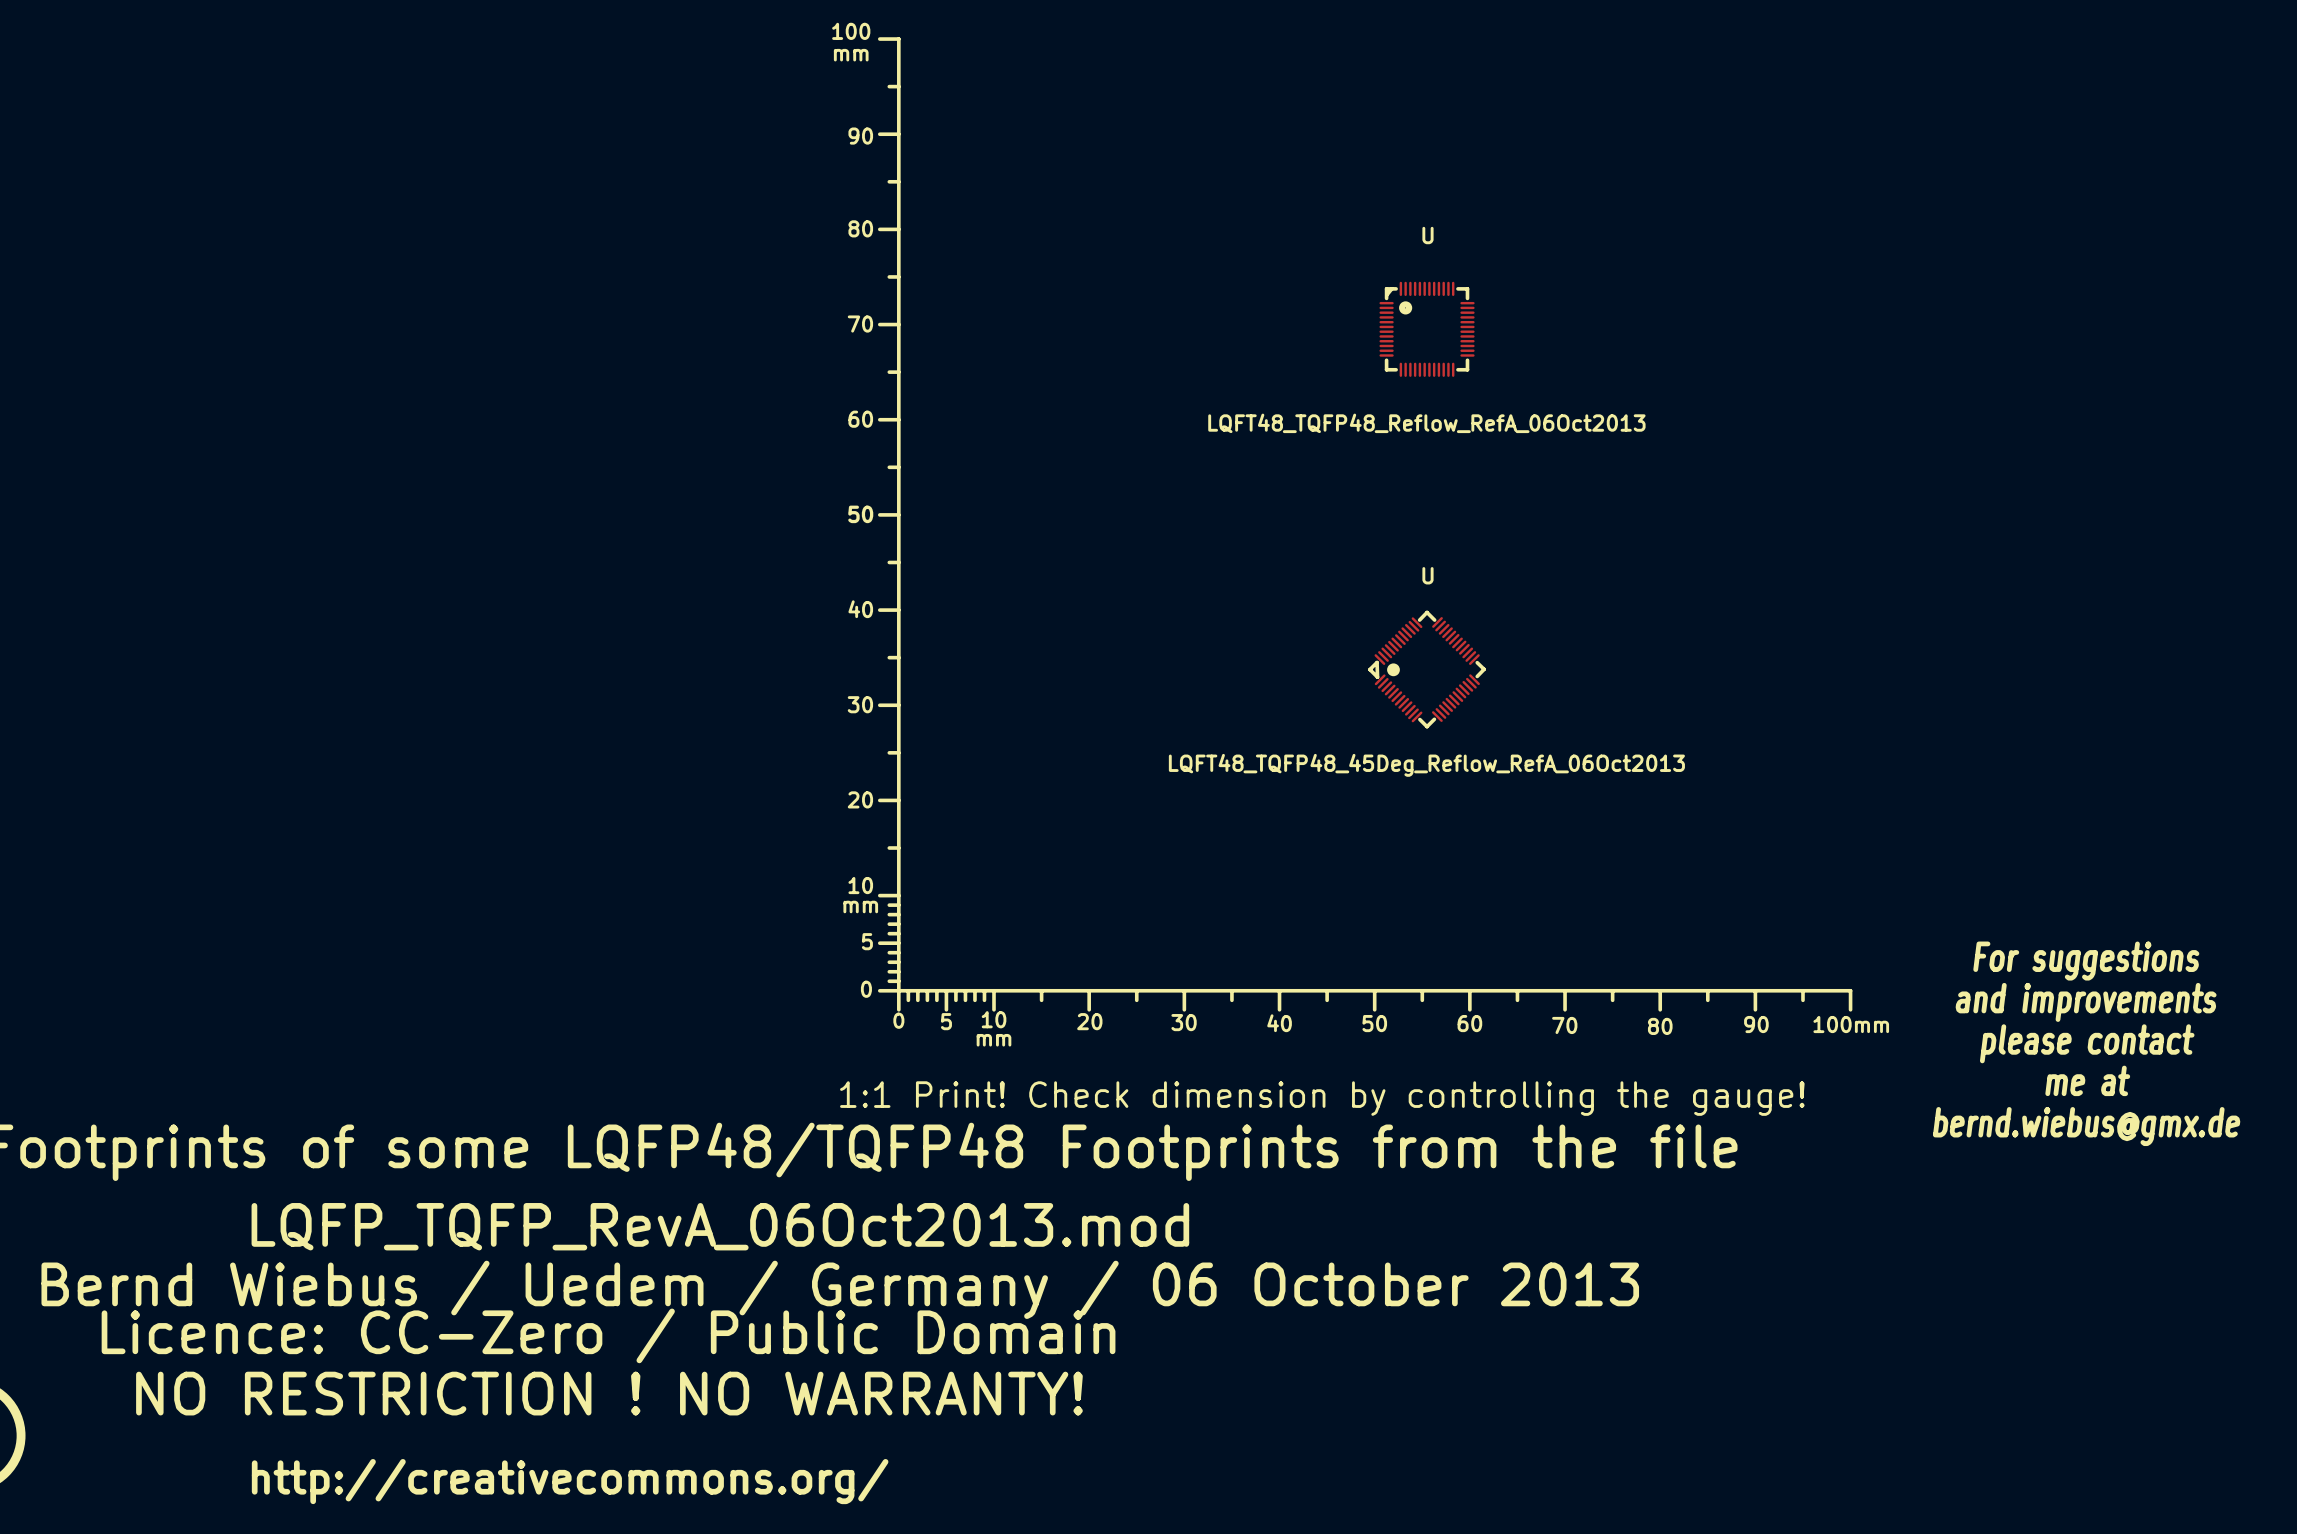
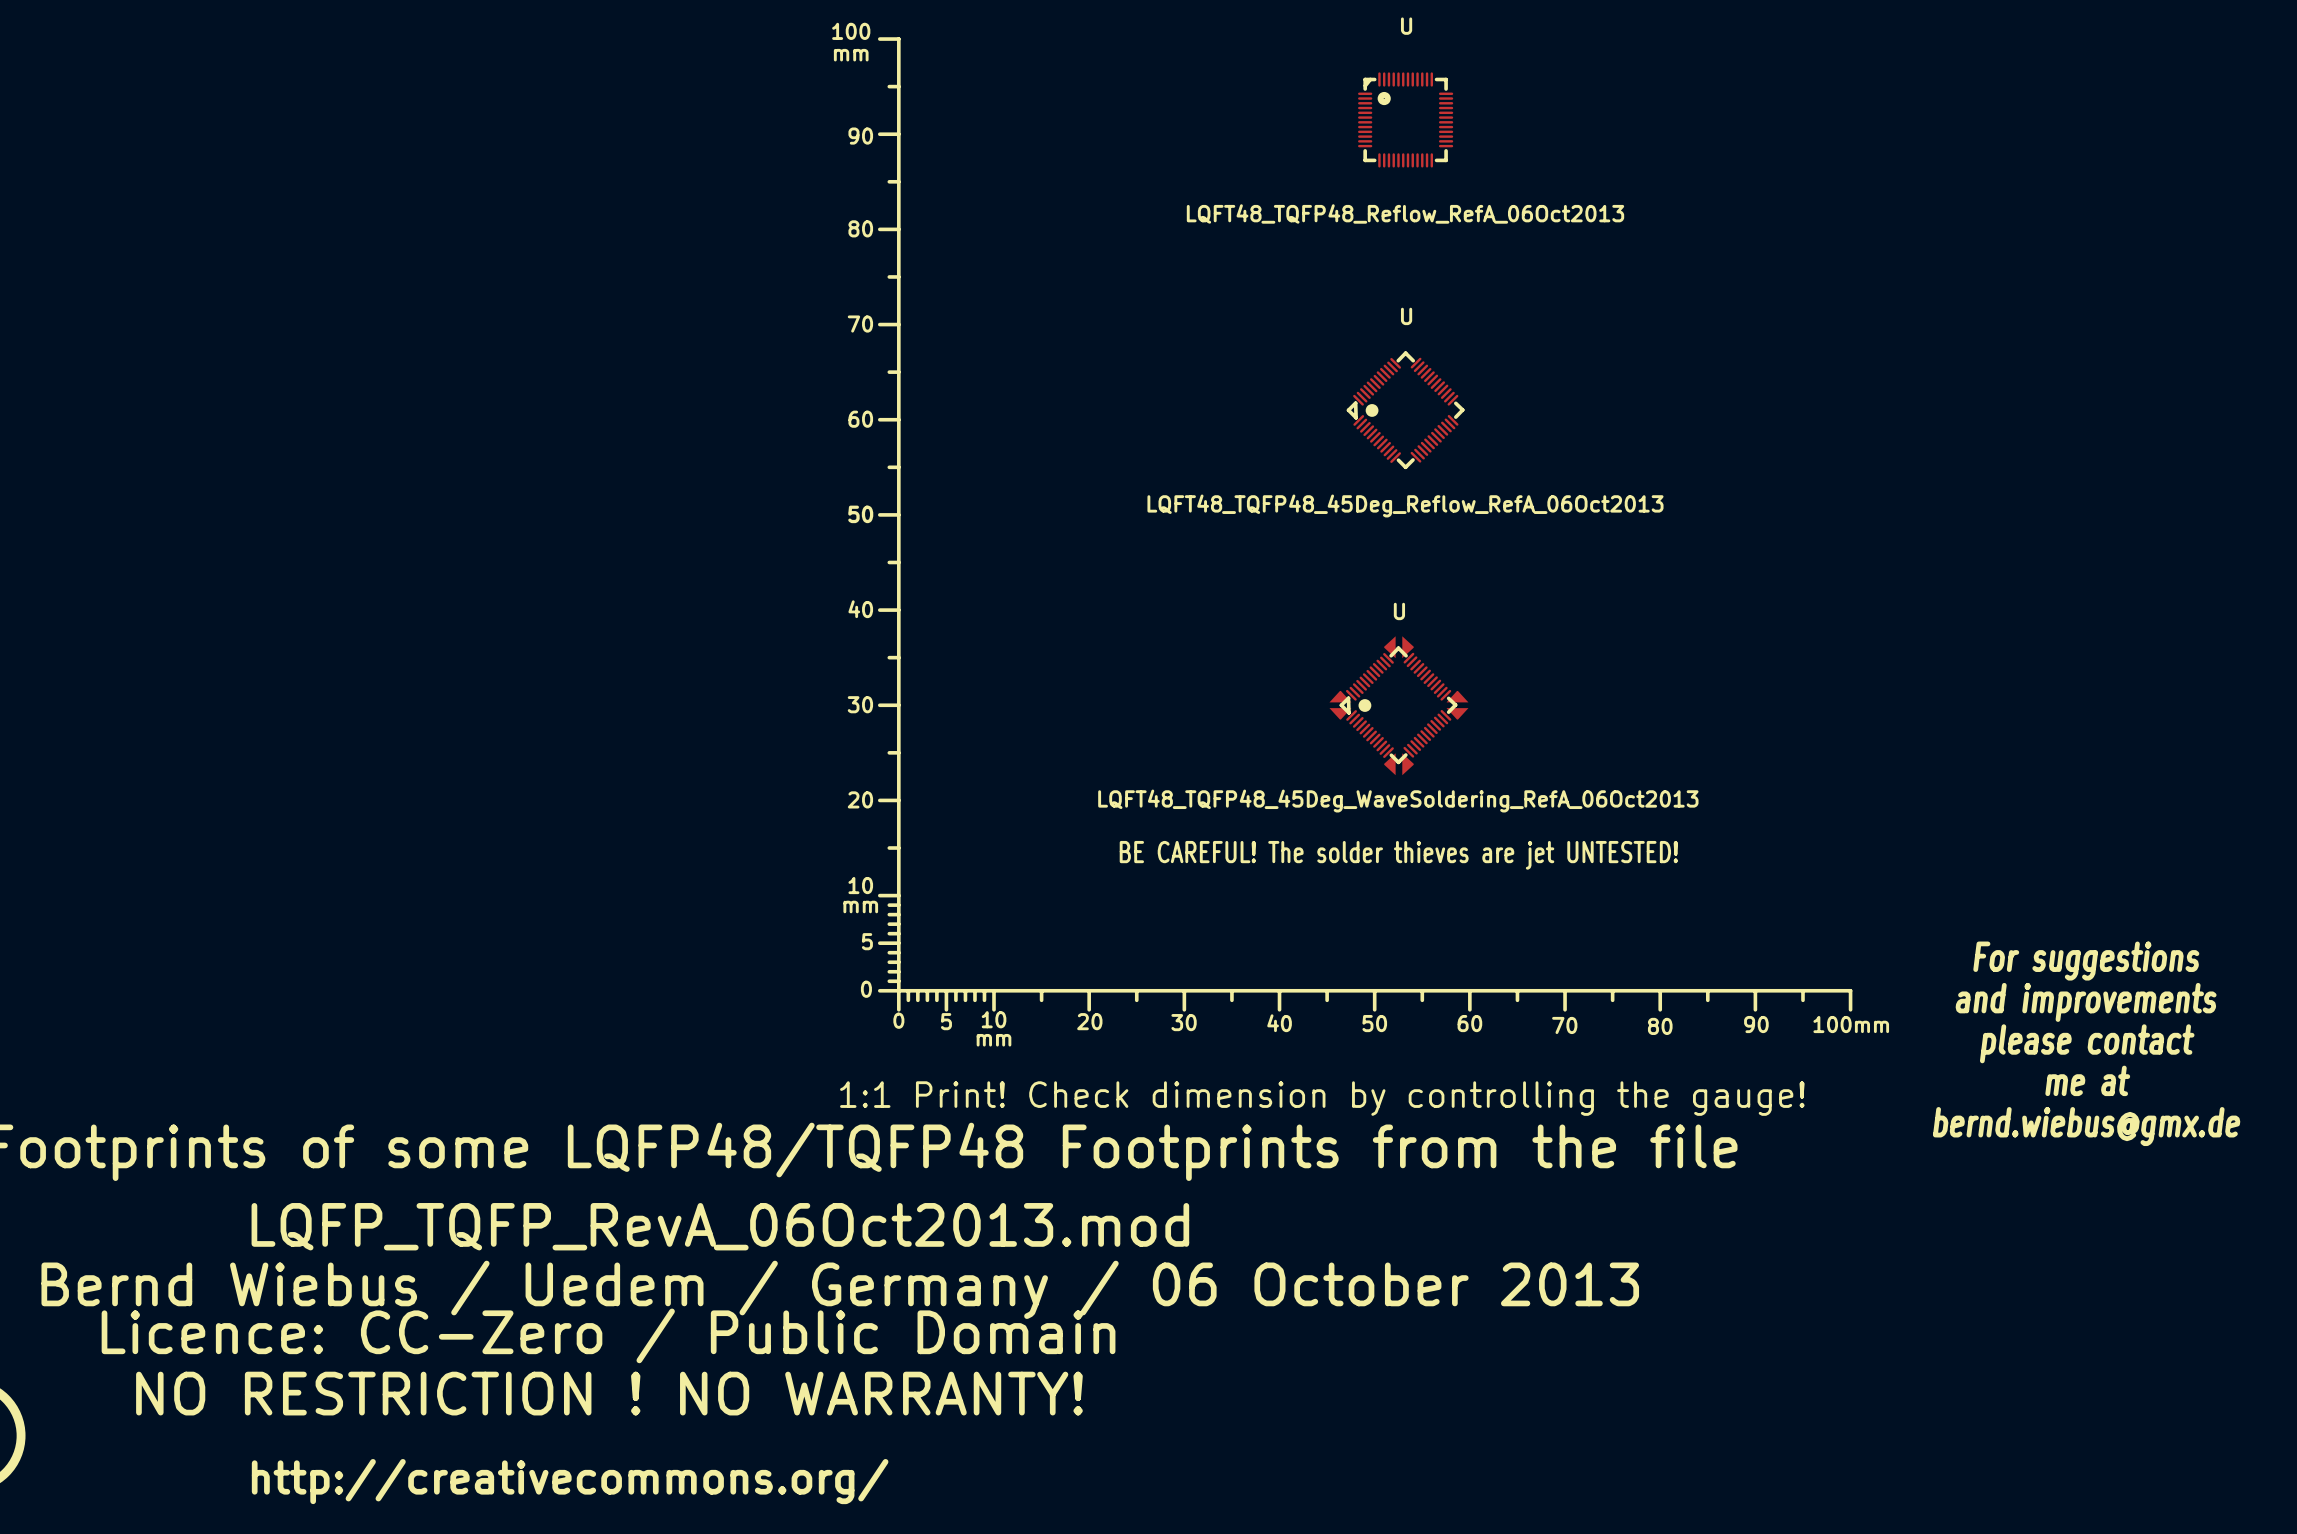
U position: (1427, 329) -> (1405, 119)
U: none -> LQFT48_TQFP48_45Deg_Reflow_RefA_06Oct2013 (1405, 410)
U: LQFT48_TQFP48_45Deg_Reflow_RefA_06Oct2013 (1427, 669) -> none
U: none -> LQFT48_TQFP48_45Deg_WaveSoldering_RefA_06Oct2013 (1398, 705)
text: none -> BE CAREFUL! The solder thieves are jet UNTESTED! (1398, 855)

